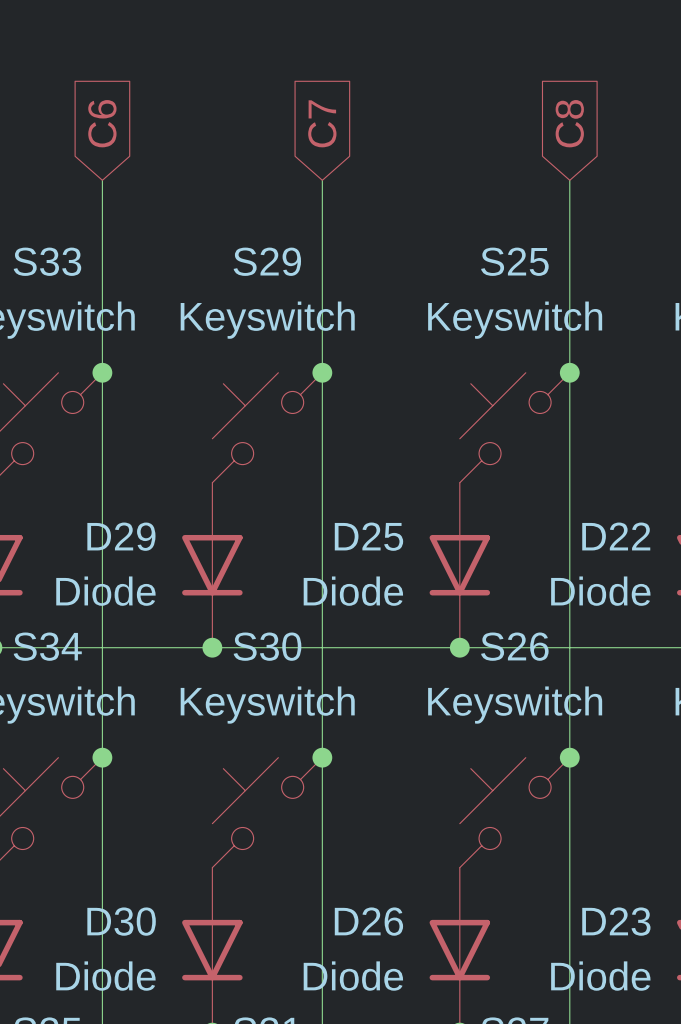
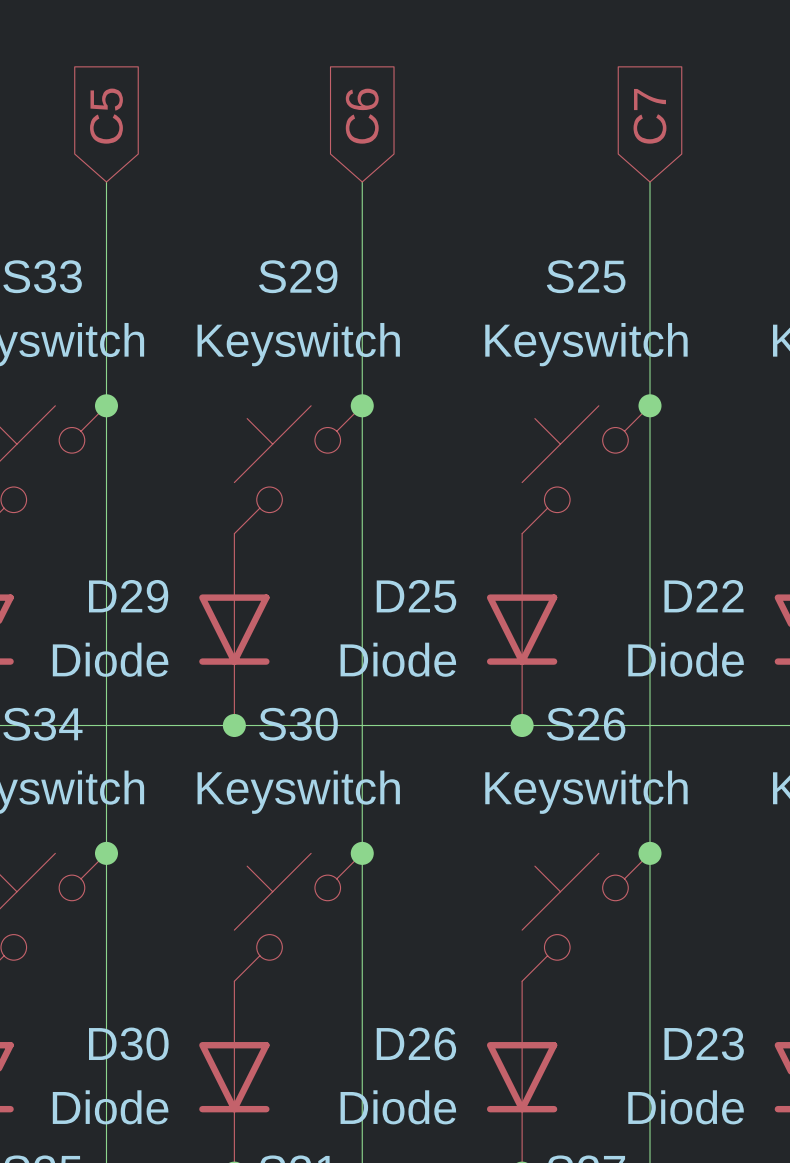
global label: C6 (102, 123) -> C5 (106, 116)
global label: C7 (322, 123) -> C6 (362, 116)
global label: C8 (569, 123) -> C7 (649, 116)

